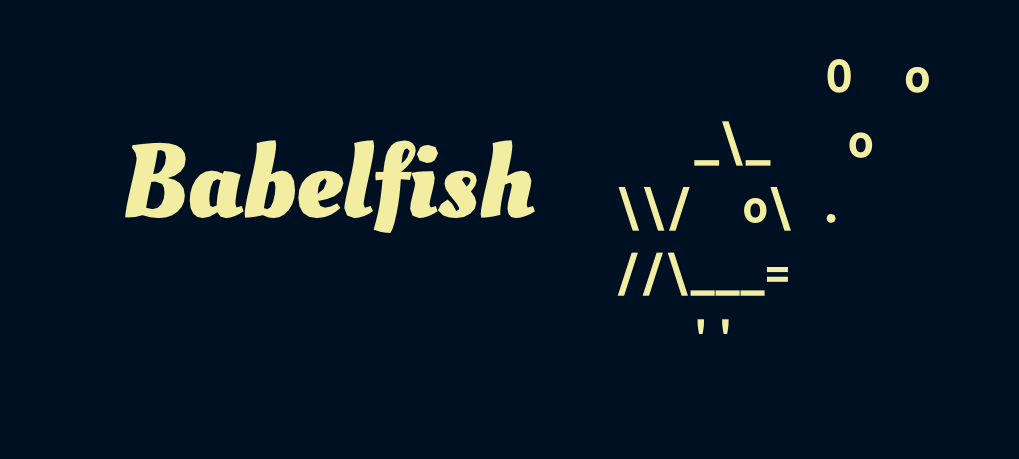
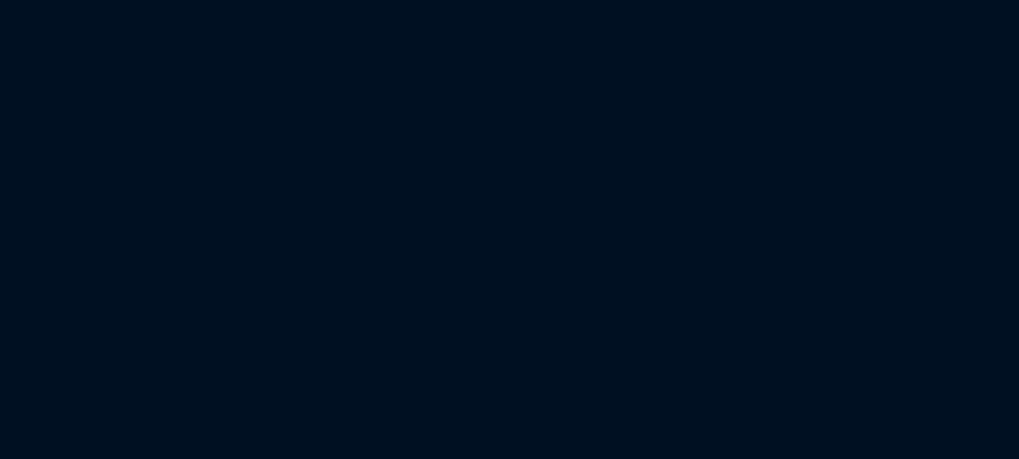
drawing: [617, 59, 929, 334] -> none
drawing: [125, 140, 535, 233] -> none

